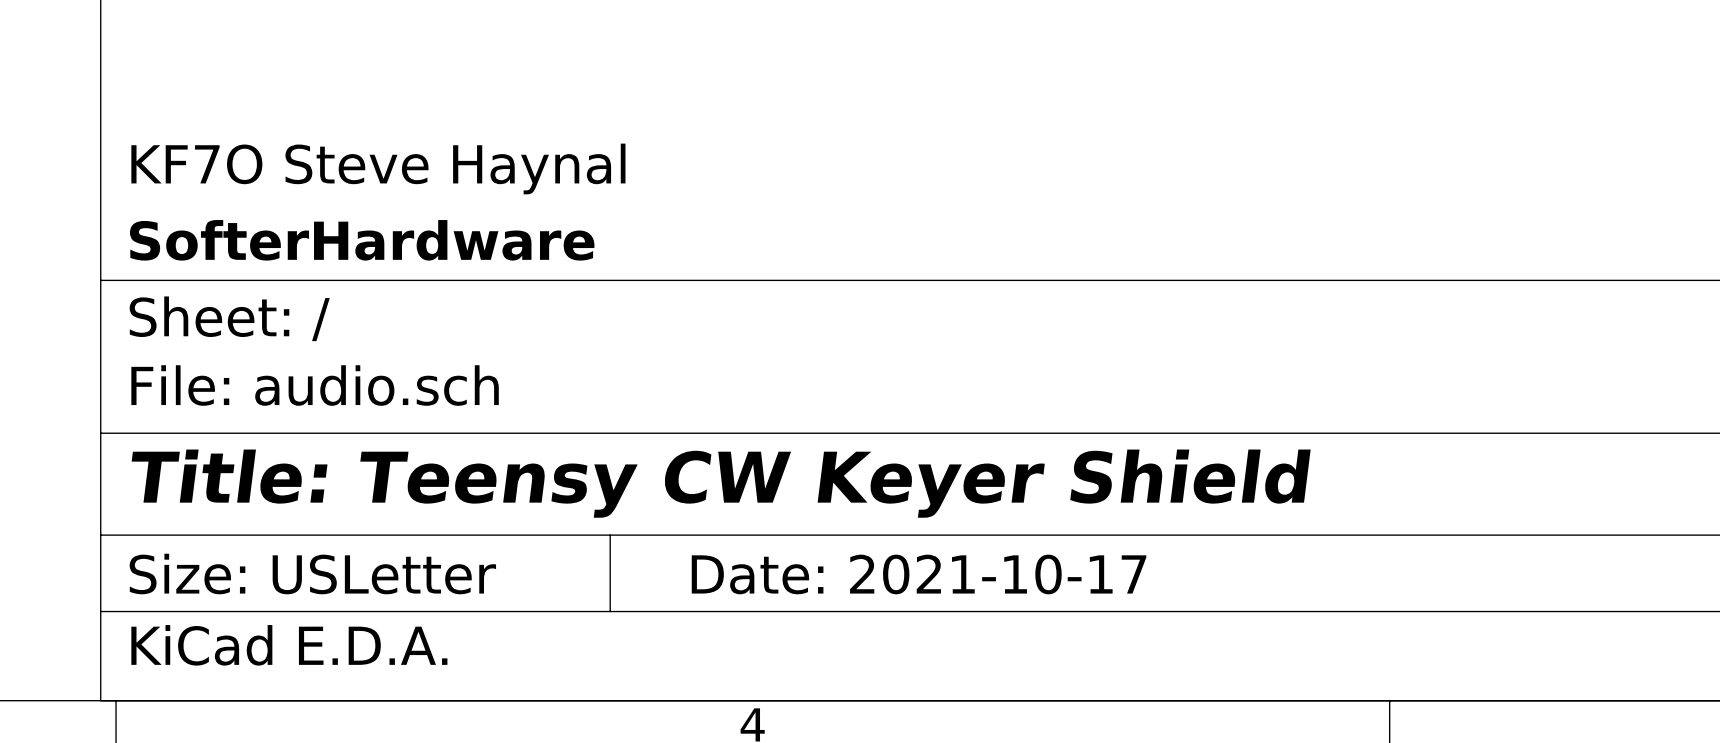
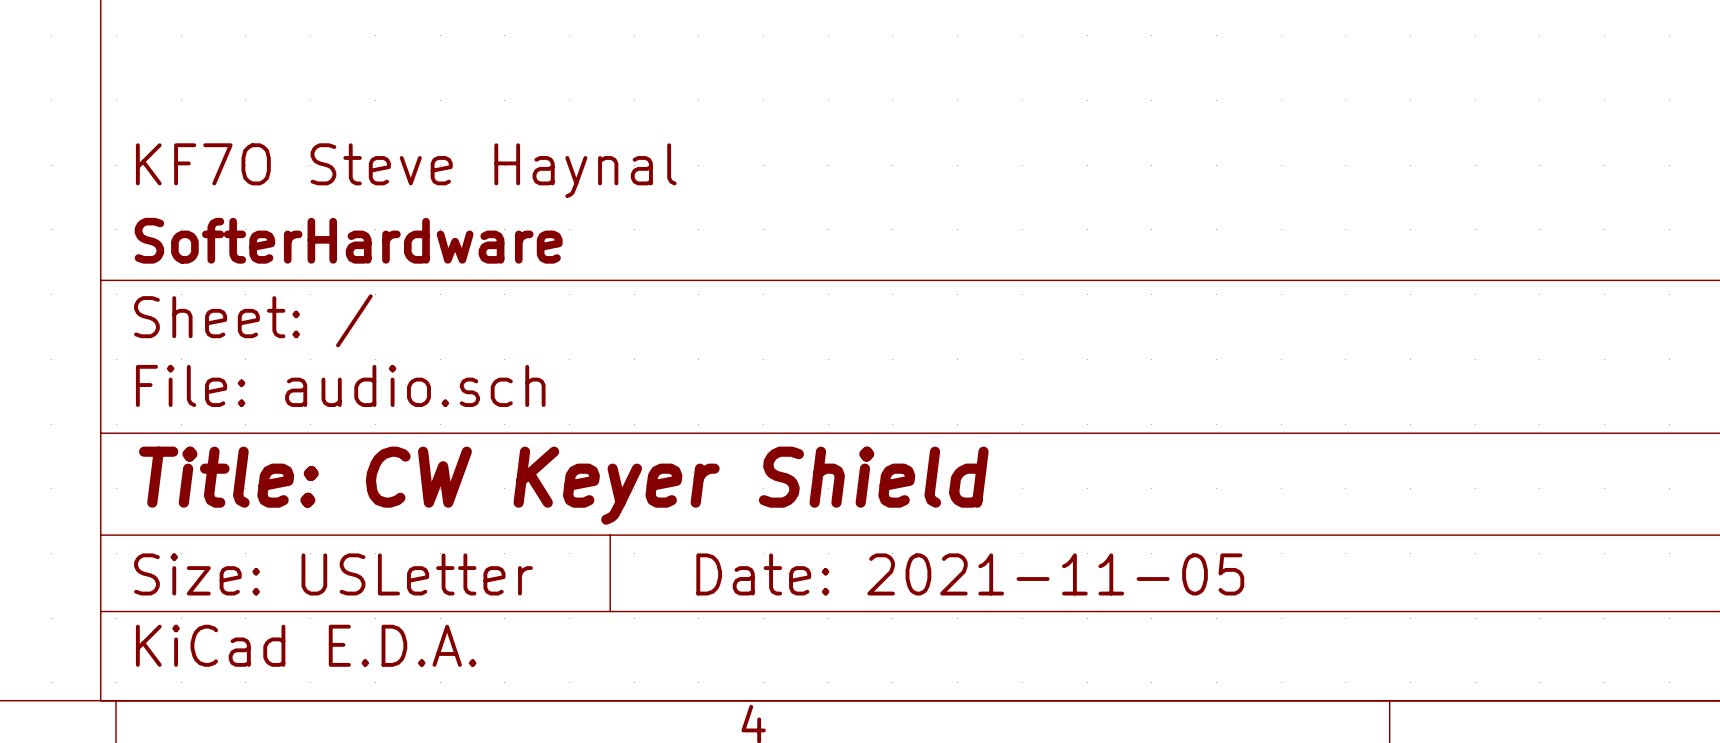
title block: Title: Teensy CW Keyer Shield (721, 483) -> Title: CW Keyer Shield (563, 485)
title block: Date: 2021-10-17 (919, 574) -> Date: 2021-11-05 (970, 574)

